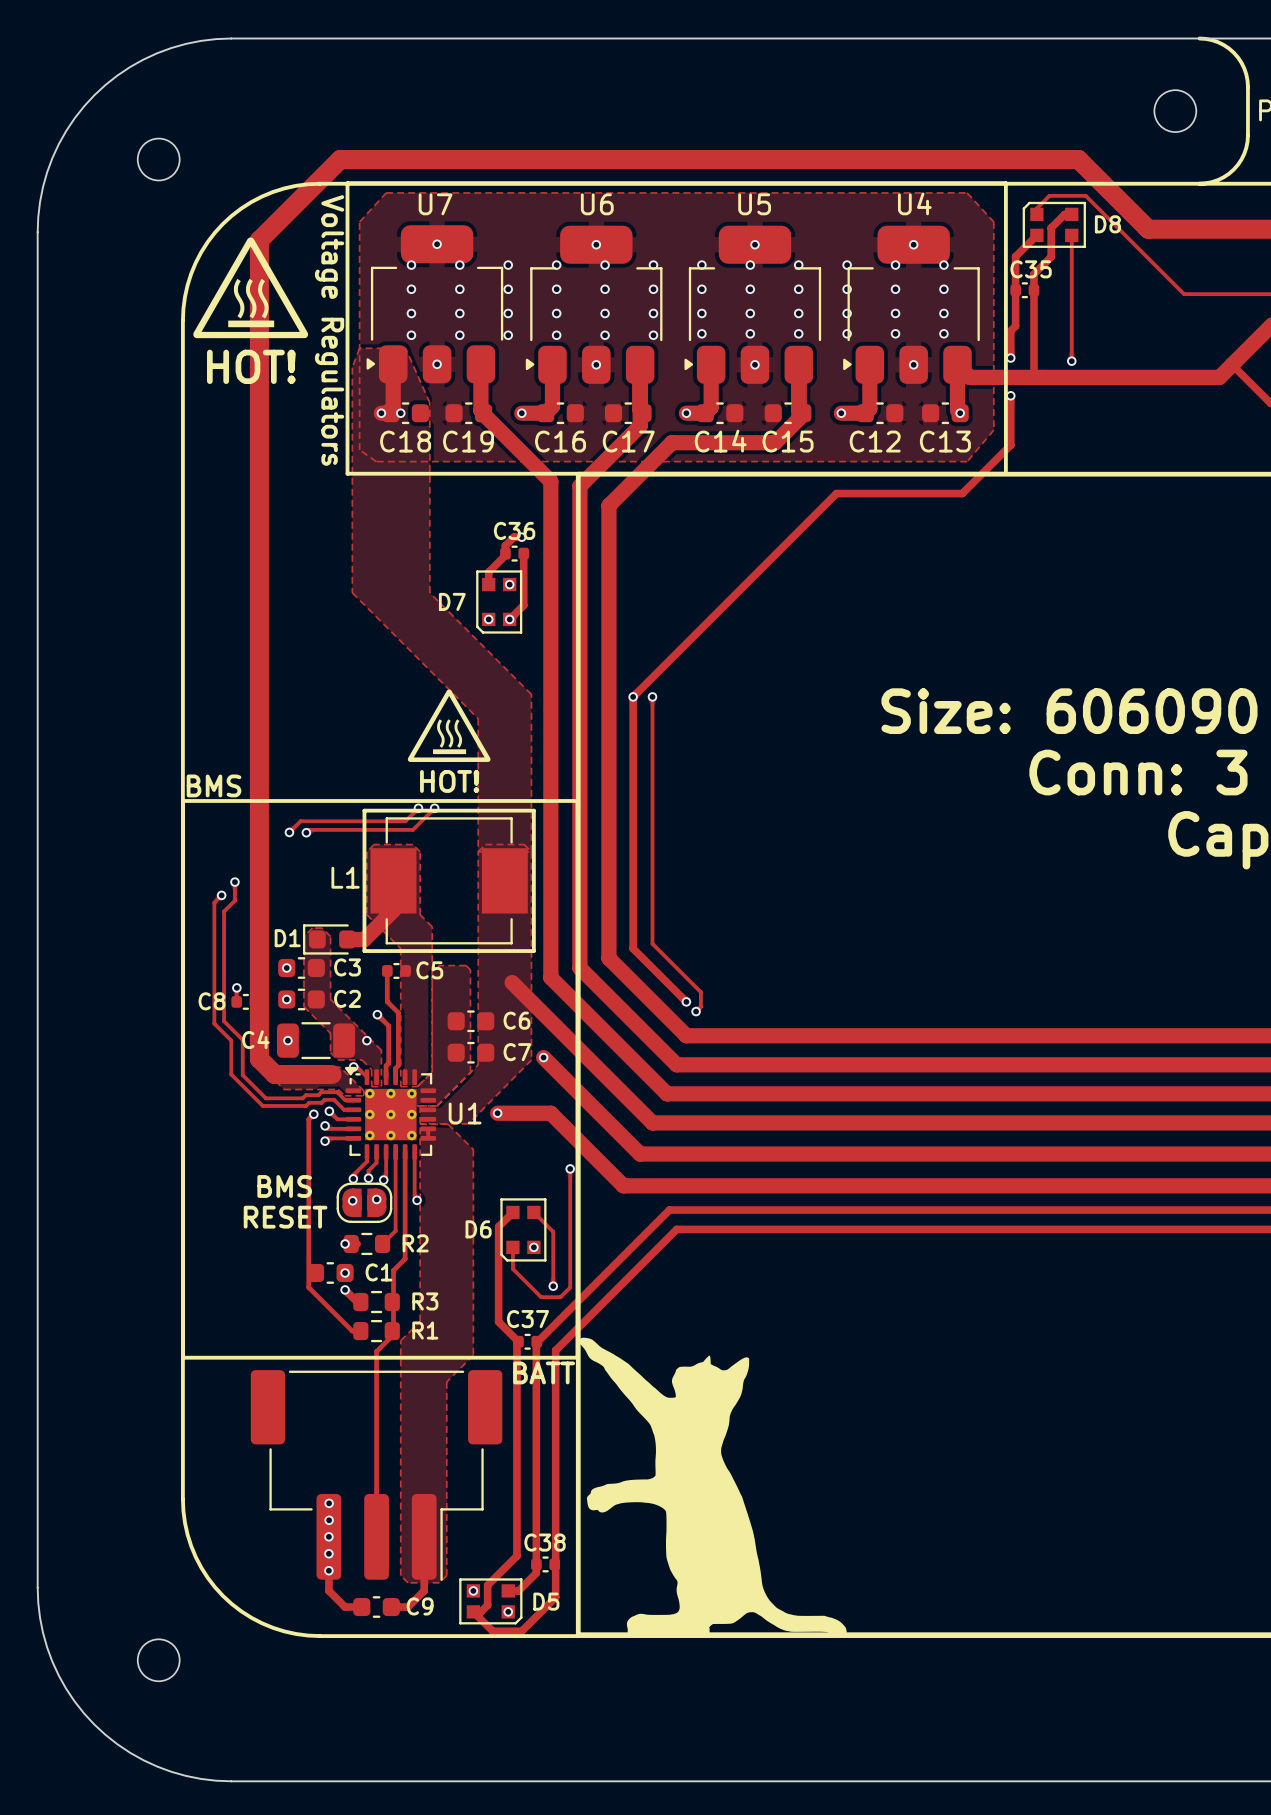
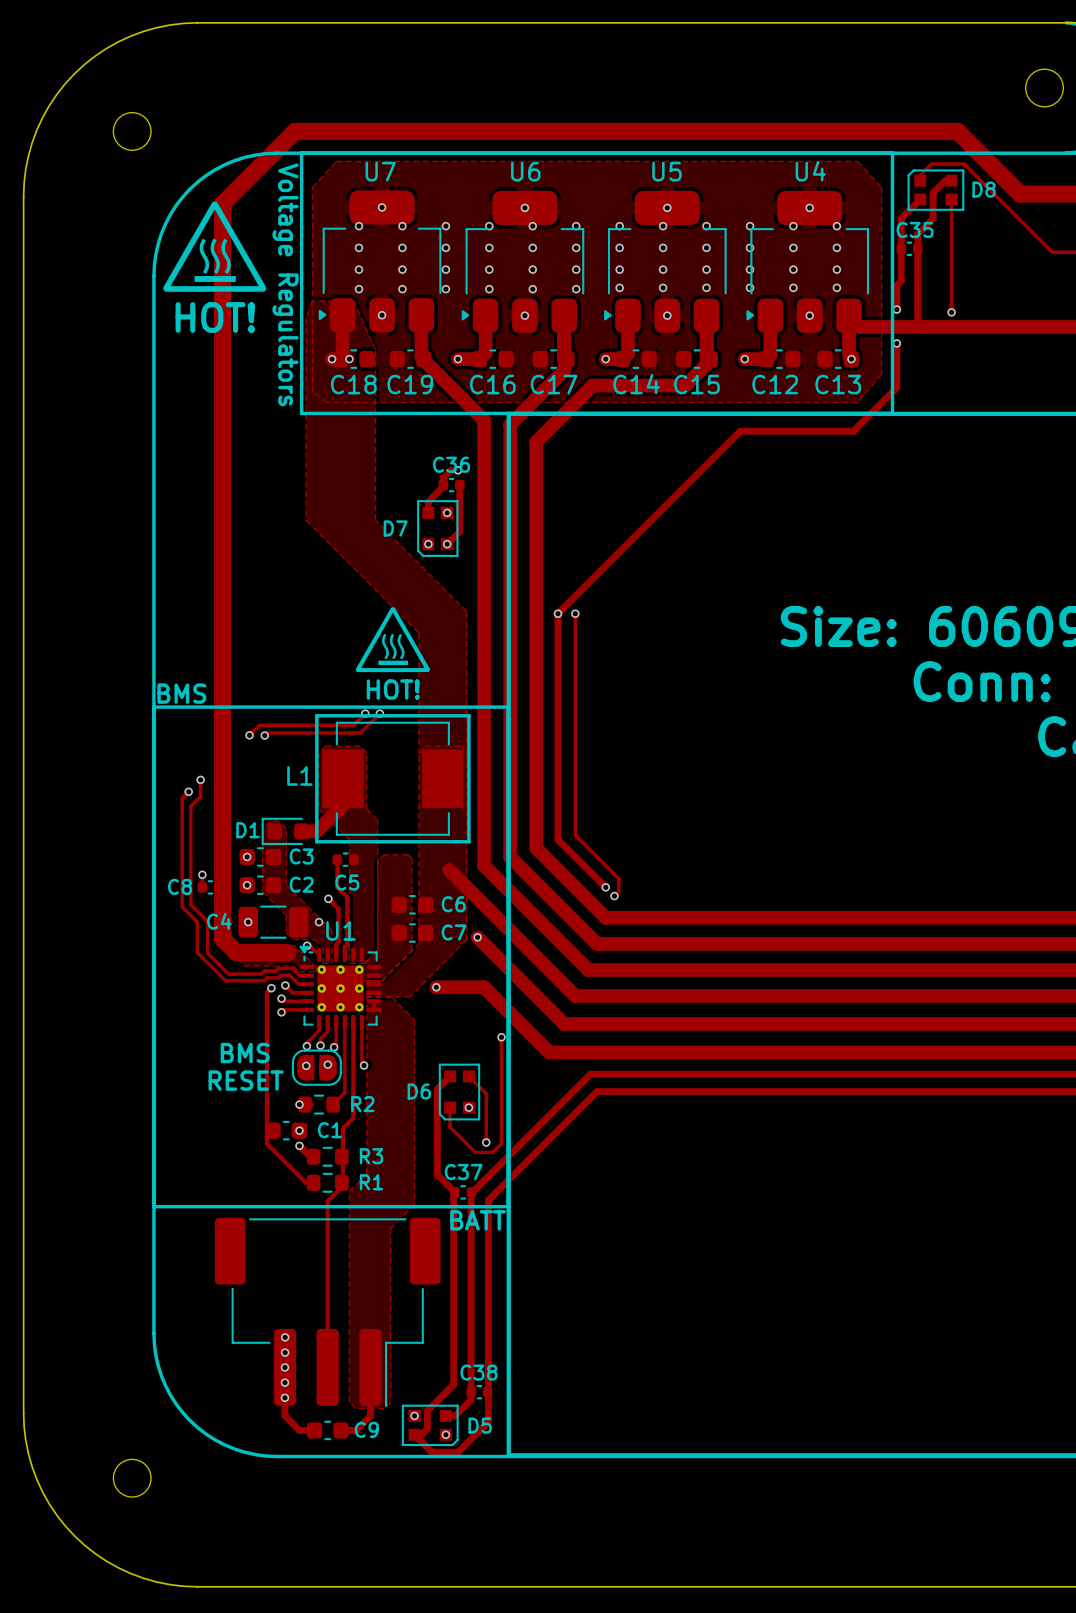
C5 name position: C5 (429, 970) -> C5 (347, 882)
U1 name position: U1 (465, 1113) -> U1 (340, 930)
drawing: [578, 1337, 847, 1638] -> none

